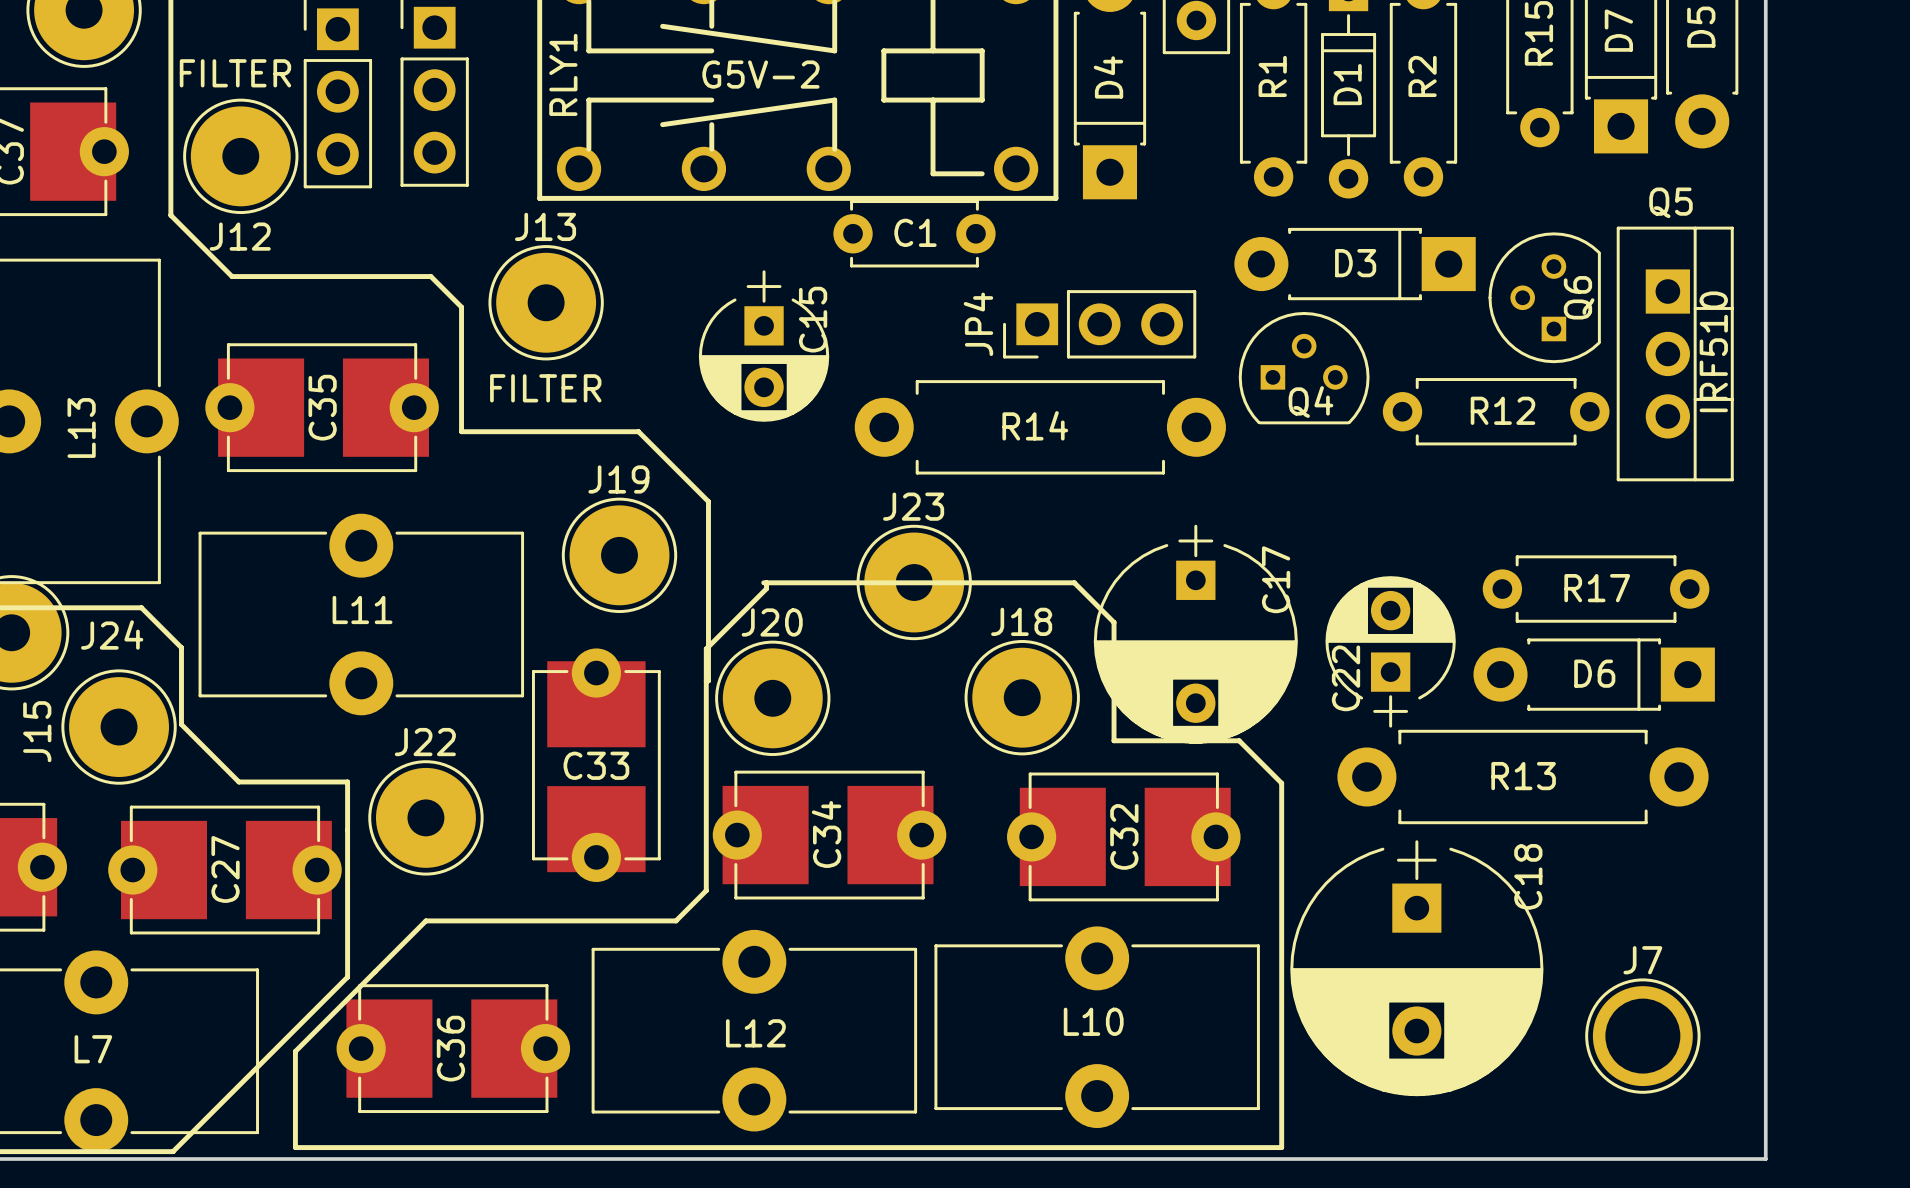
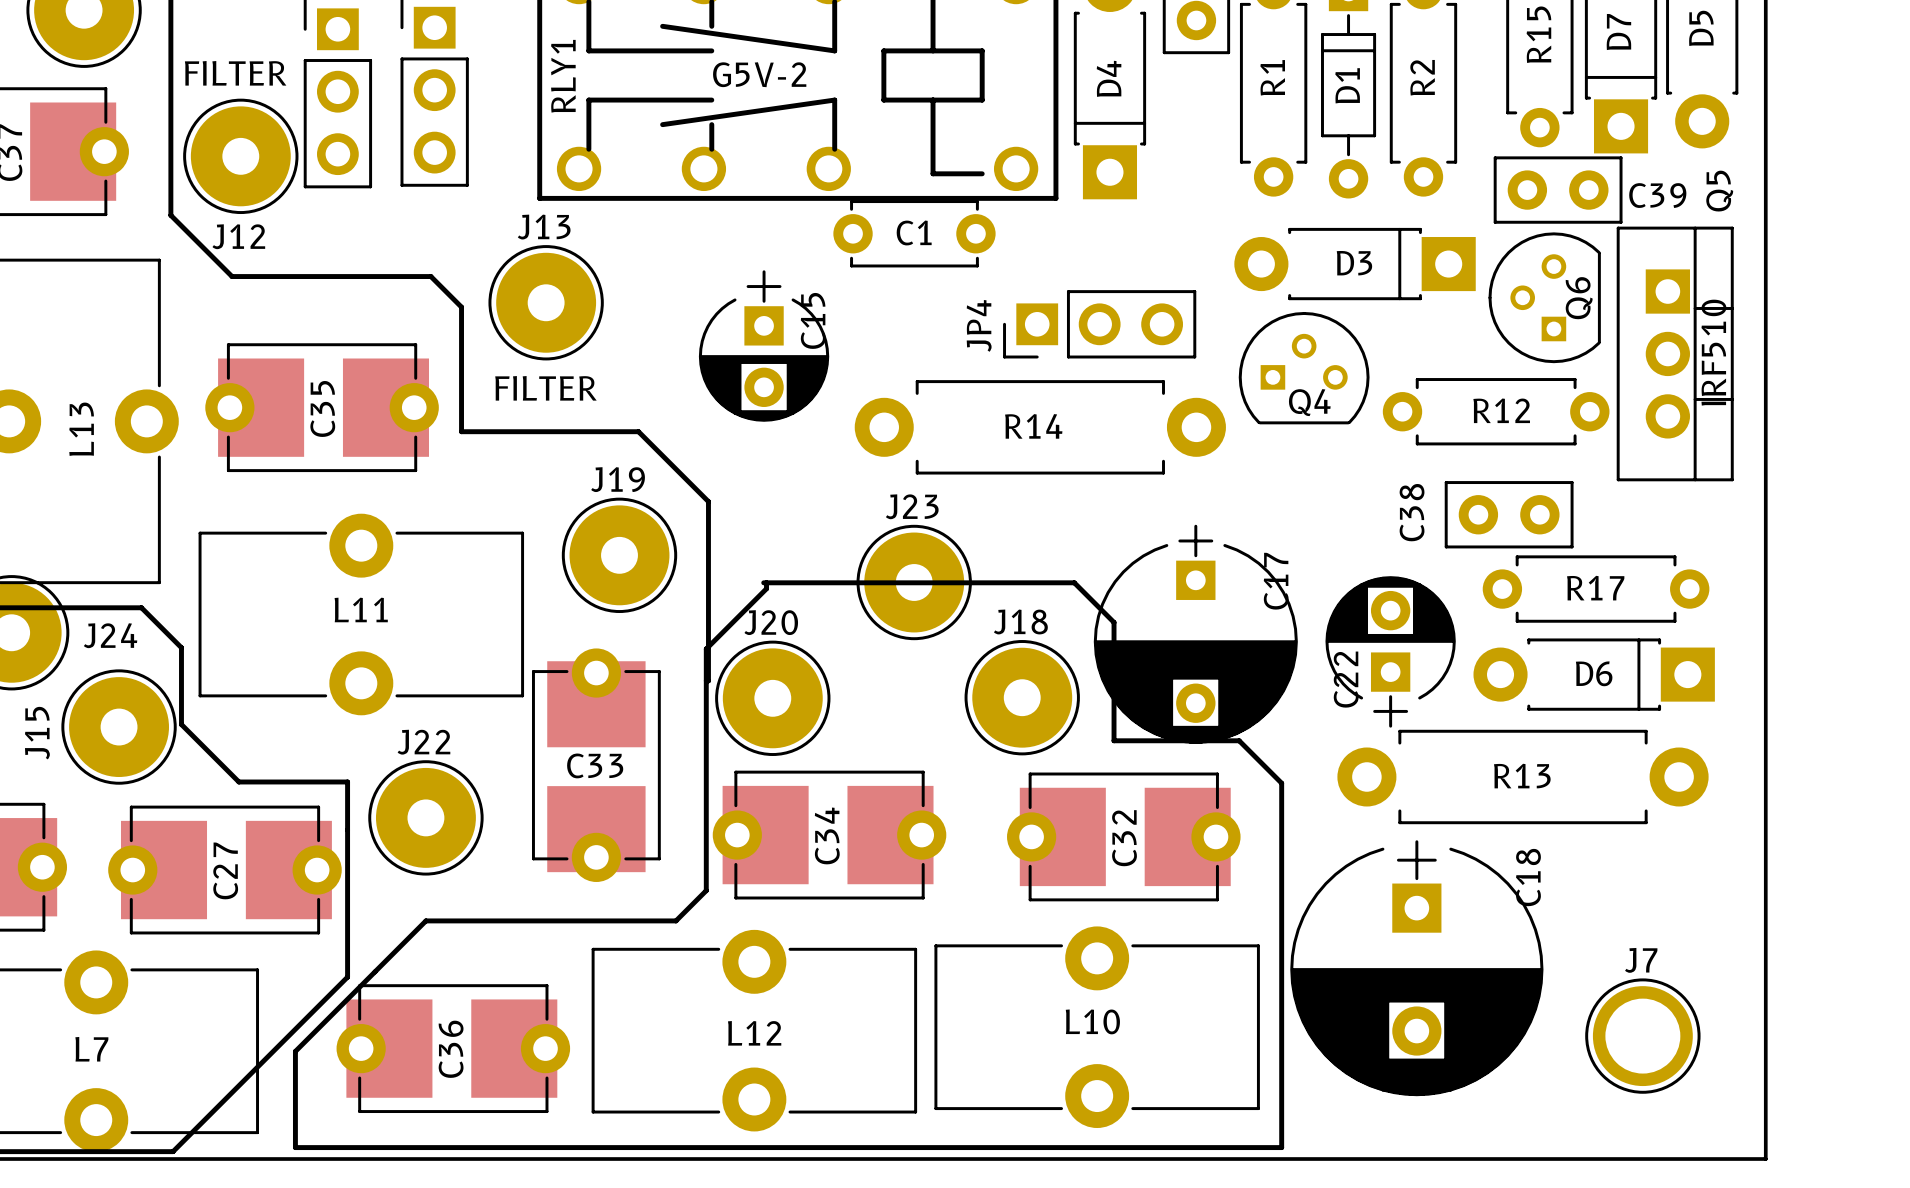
C39: none -> (1558, 190)
Q5 name rotation: 0° (1670, 202) -> 90° counterclockwise (1719, 191)
C38: none -> (1509, 514)

